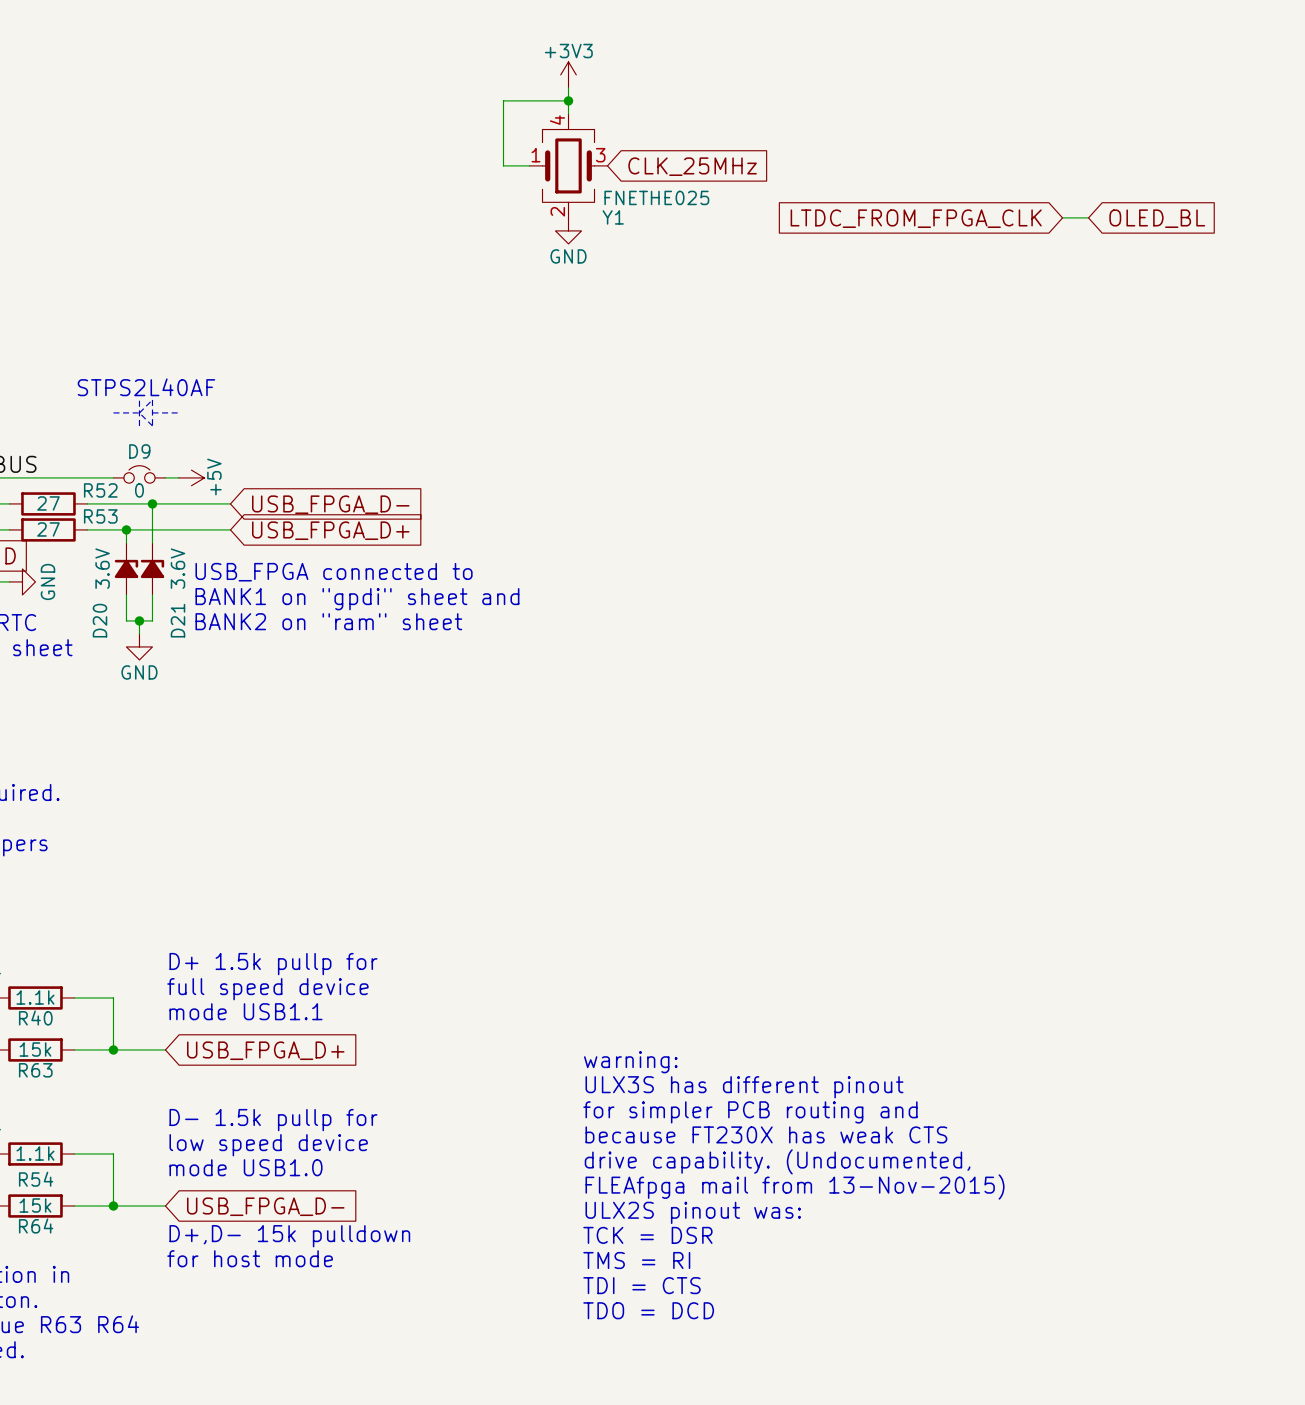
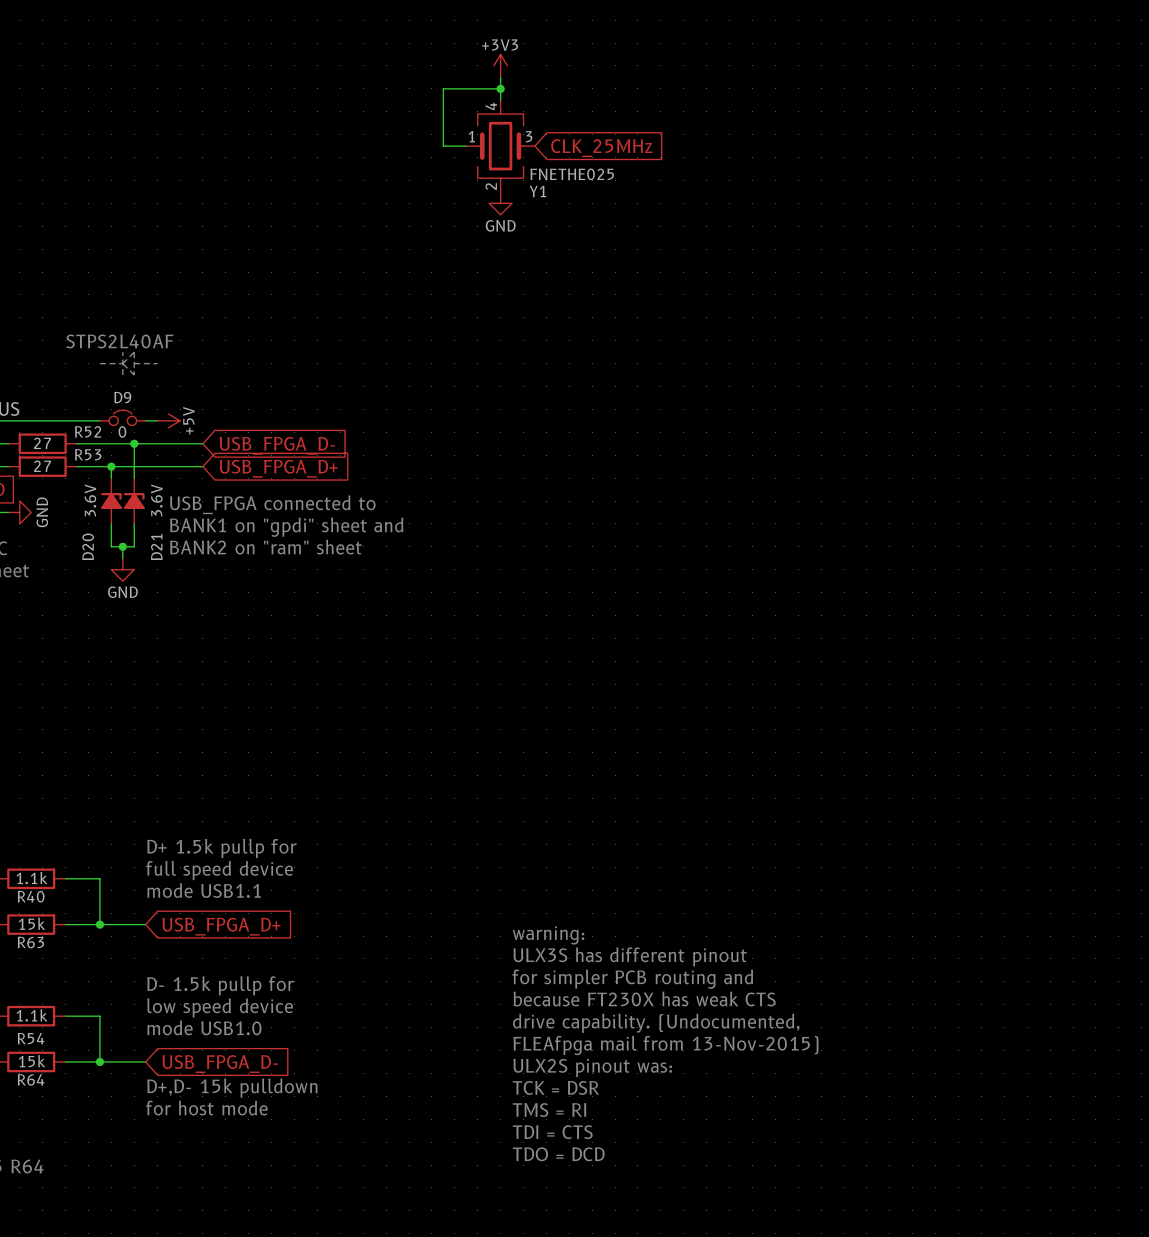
wire: (1062, 217) (1088, 217) -> none
global label: LTDC_FROM_FPGA_CLK (916, 218) -> none
global label: OLED_BL (1157, 218) -> none

